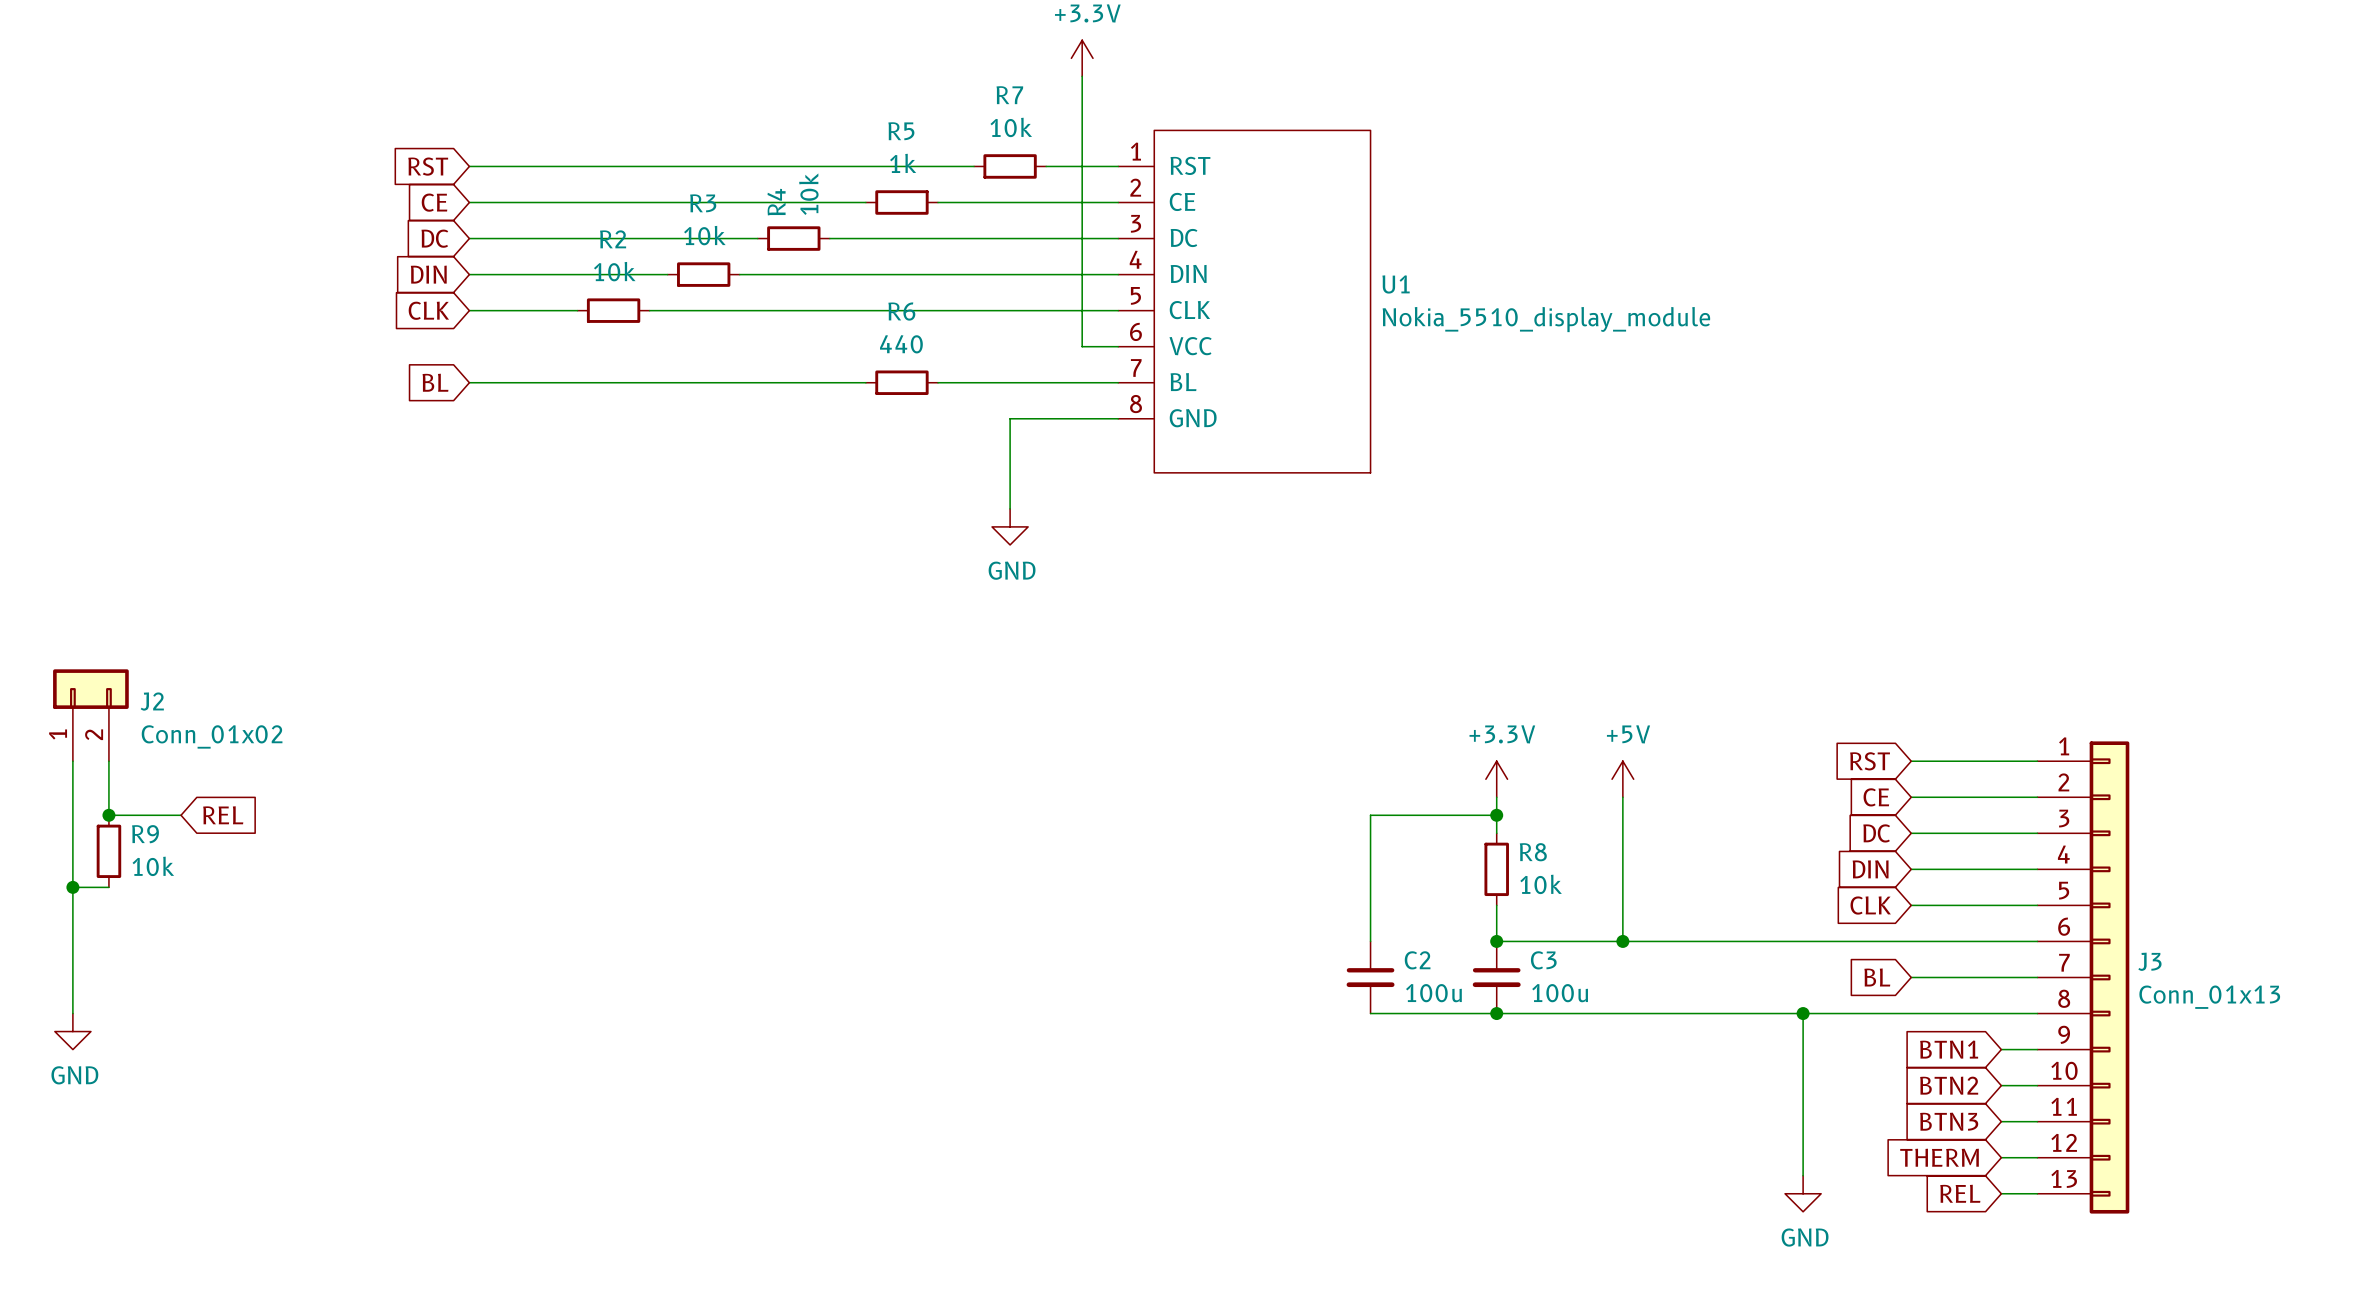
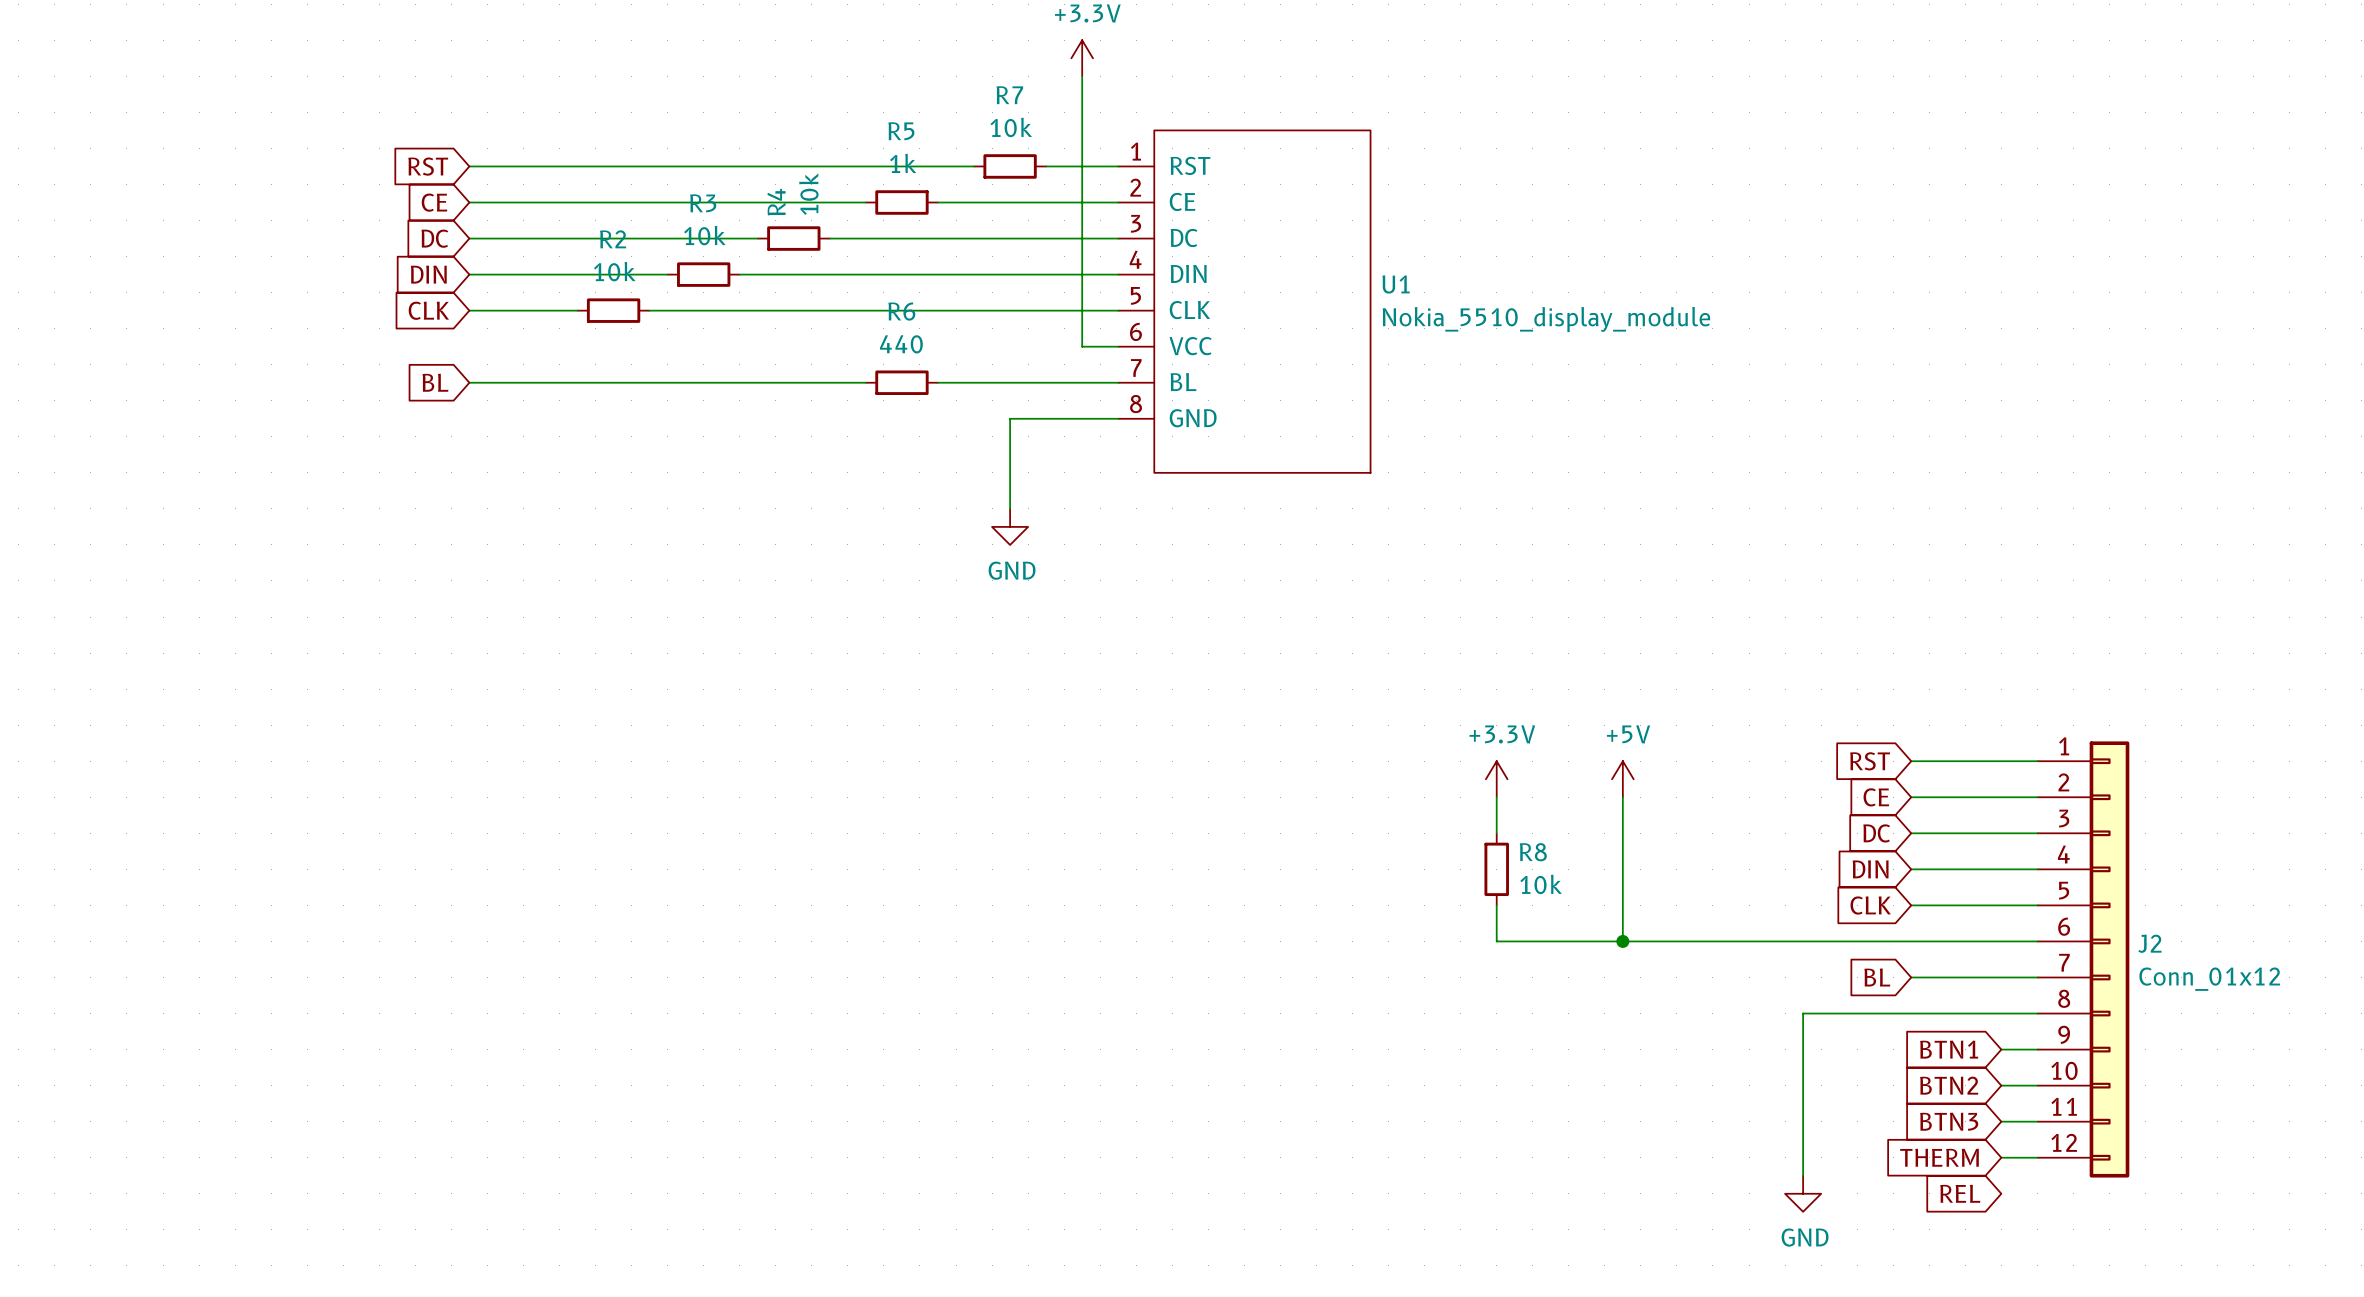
J2 symbol: [53, 669, 129, 762] -> [2037, 741, 2130, 1178]
J2 value: Conn_01x02 (212, 736) -> Conn_01x12 (2209, 979)
wire: (72, 761) (72, 1013) -> none
wire: (108, 761) (108, 815) (181, 815) -> none
junction: (108, 815) -> none
global label: REL (223, 815) -> none
wire: (1496, 815) (1370, 815) (1370, 941) -> none
junction: (1496, 815) -> none
R9: 10k (108, 851) -> none
wire: (72, 887) (108, 887) -> none
junction: (72, 887) -> none
junction: (1496, 941) -> none
C2: 100u (1370, 977) -> none
C3: 100u (1496, 977) -> none
J3: Conn_01x13 (2083, 977) -> none
wire: (1370, 1013) (1803, 1013) -> none
junction: (1496, 1013) -> none
junction: (1803, 1013) -> none
power symbol: GND (72, 1031) -> none
wire: (2001, 1193) (2037, 1193) -> none

